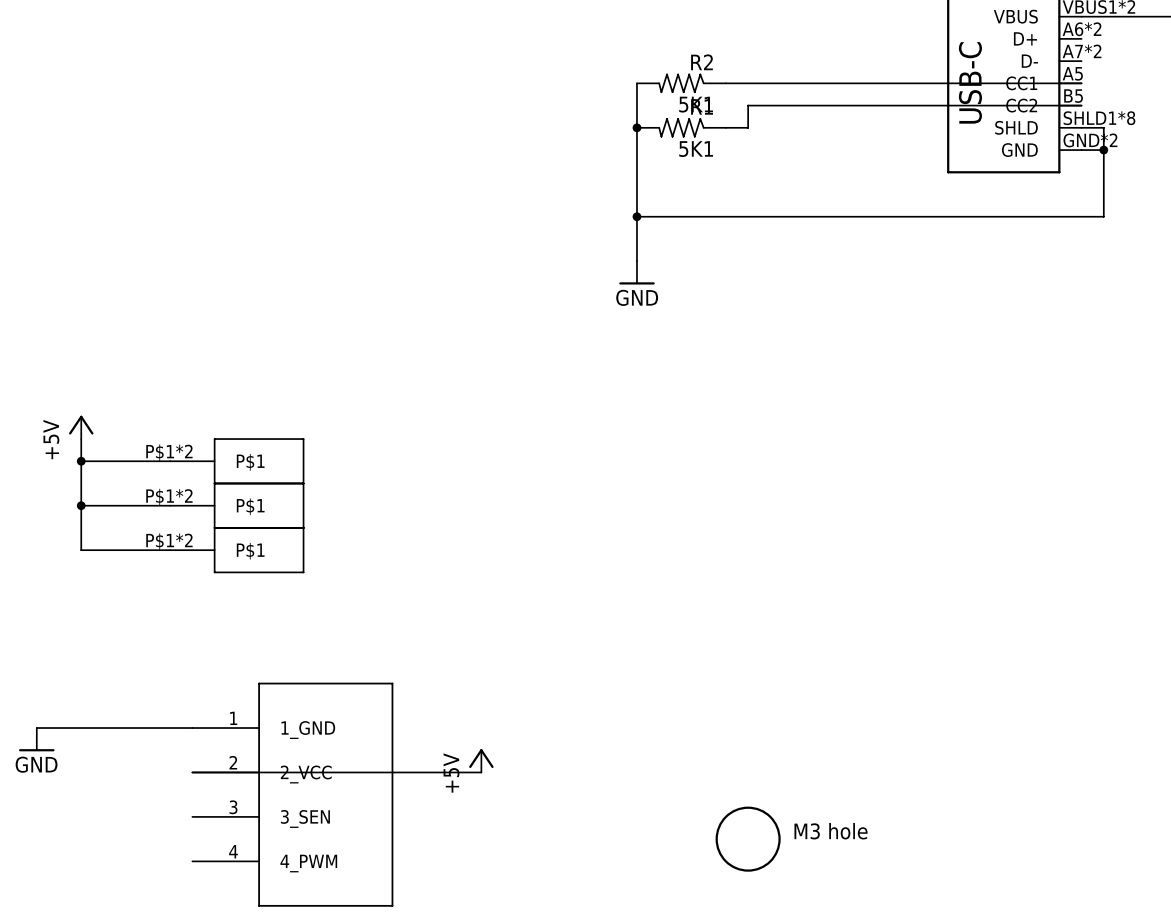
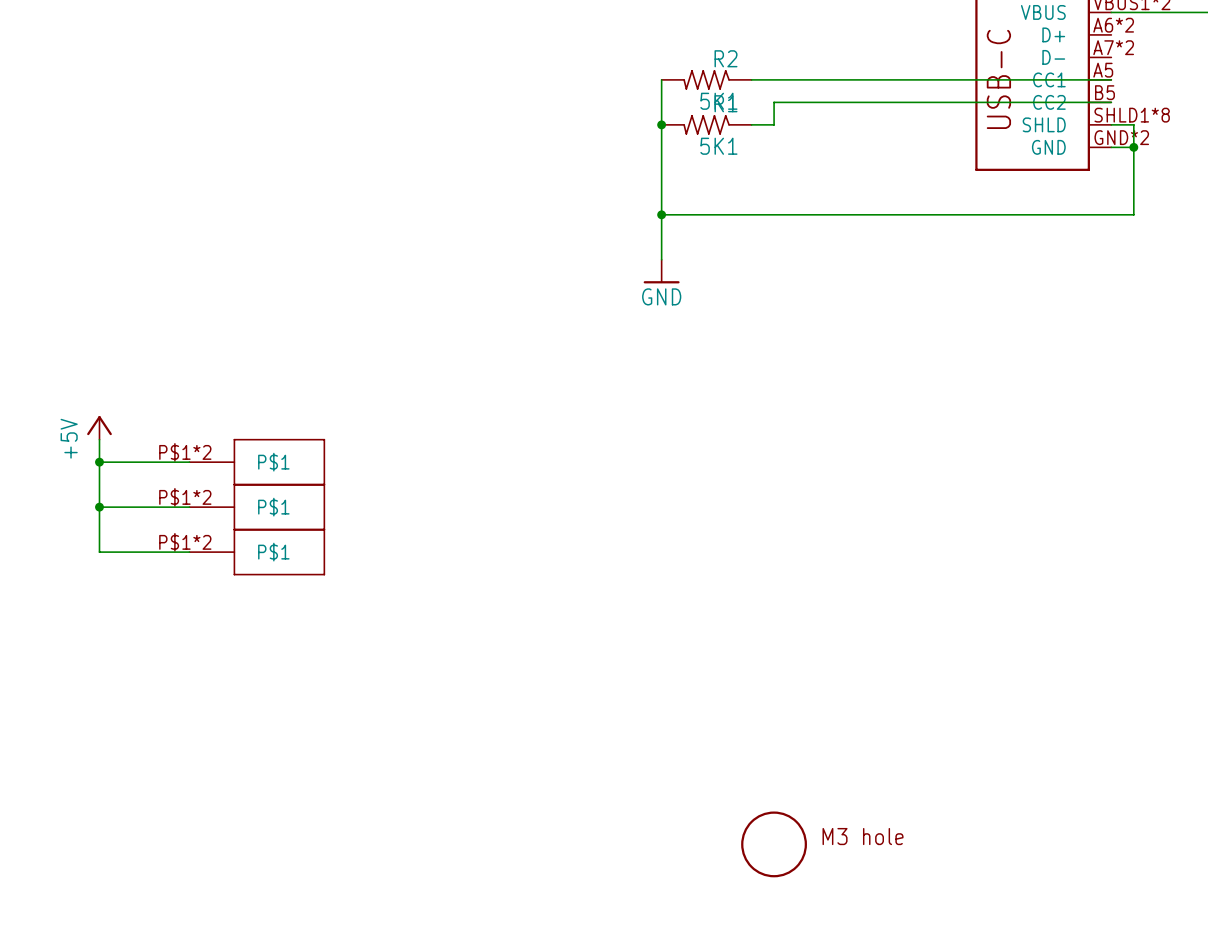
wire: (36, 728) (192, 728) -> none
power symbol: GND (36, 739) -> none
power symbol: +5V (481, 760) -> none
wire: (192, 772) (481, 772) -> none
part: (292, 794) -> none

